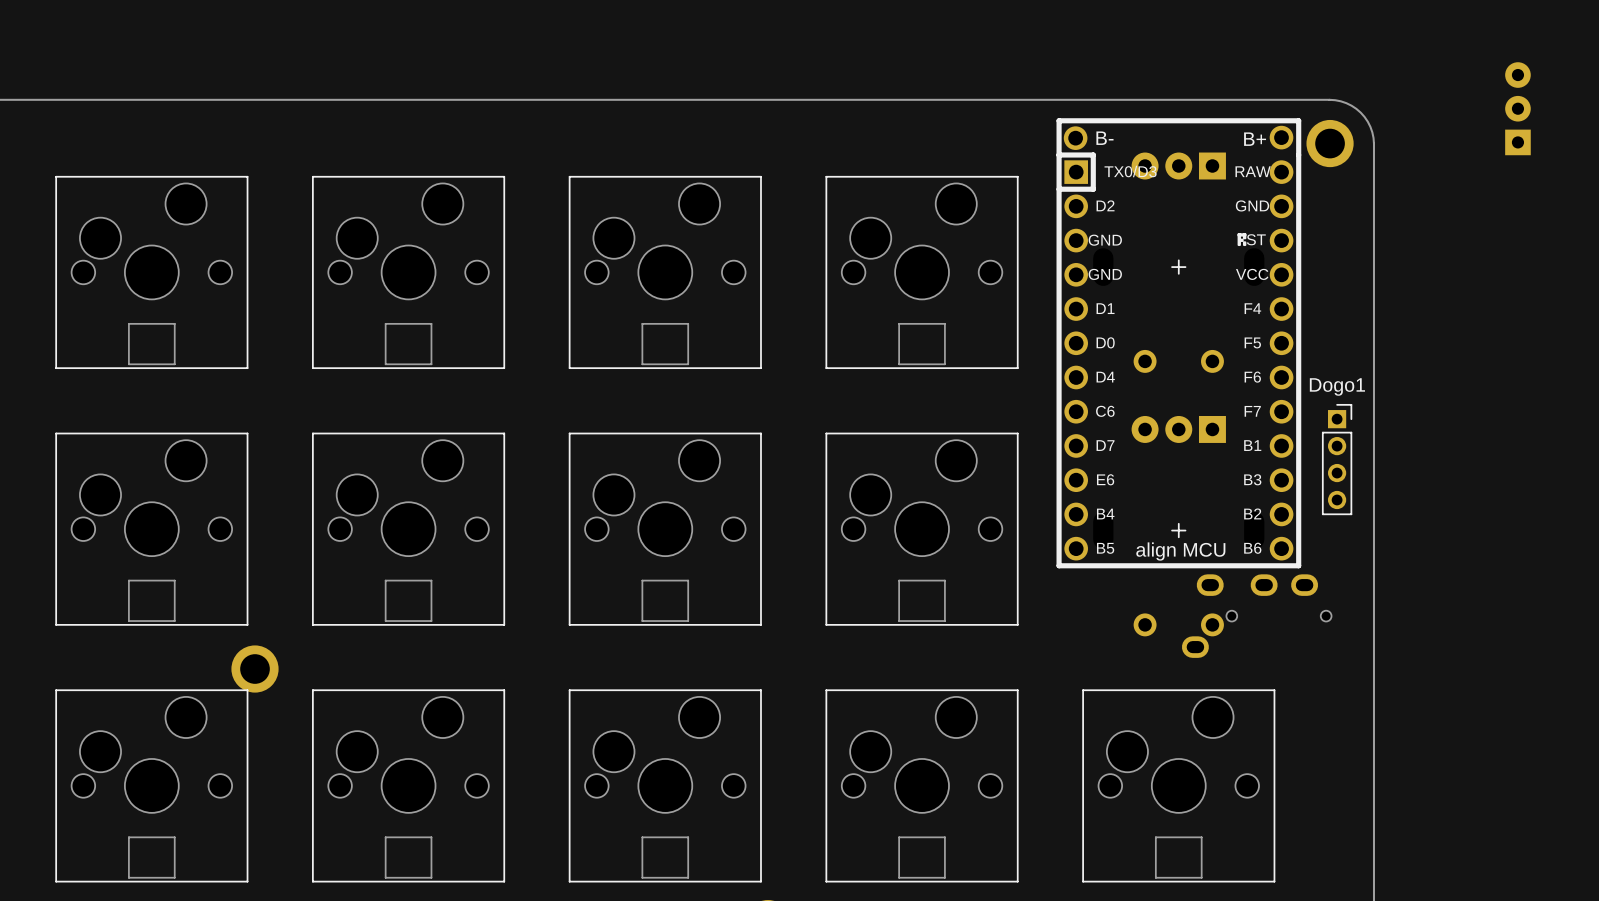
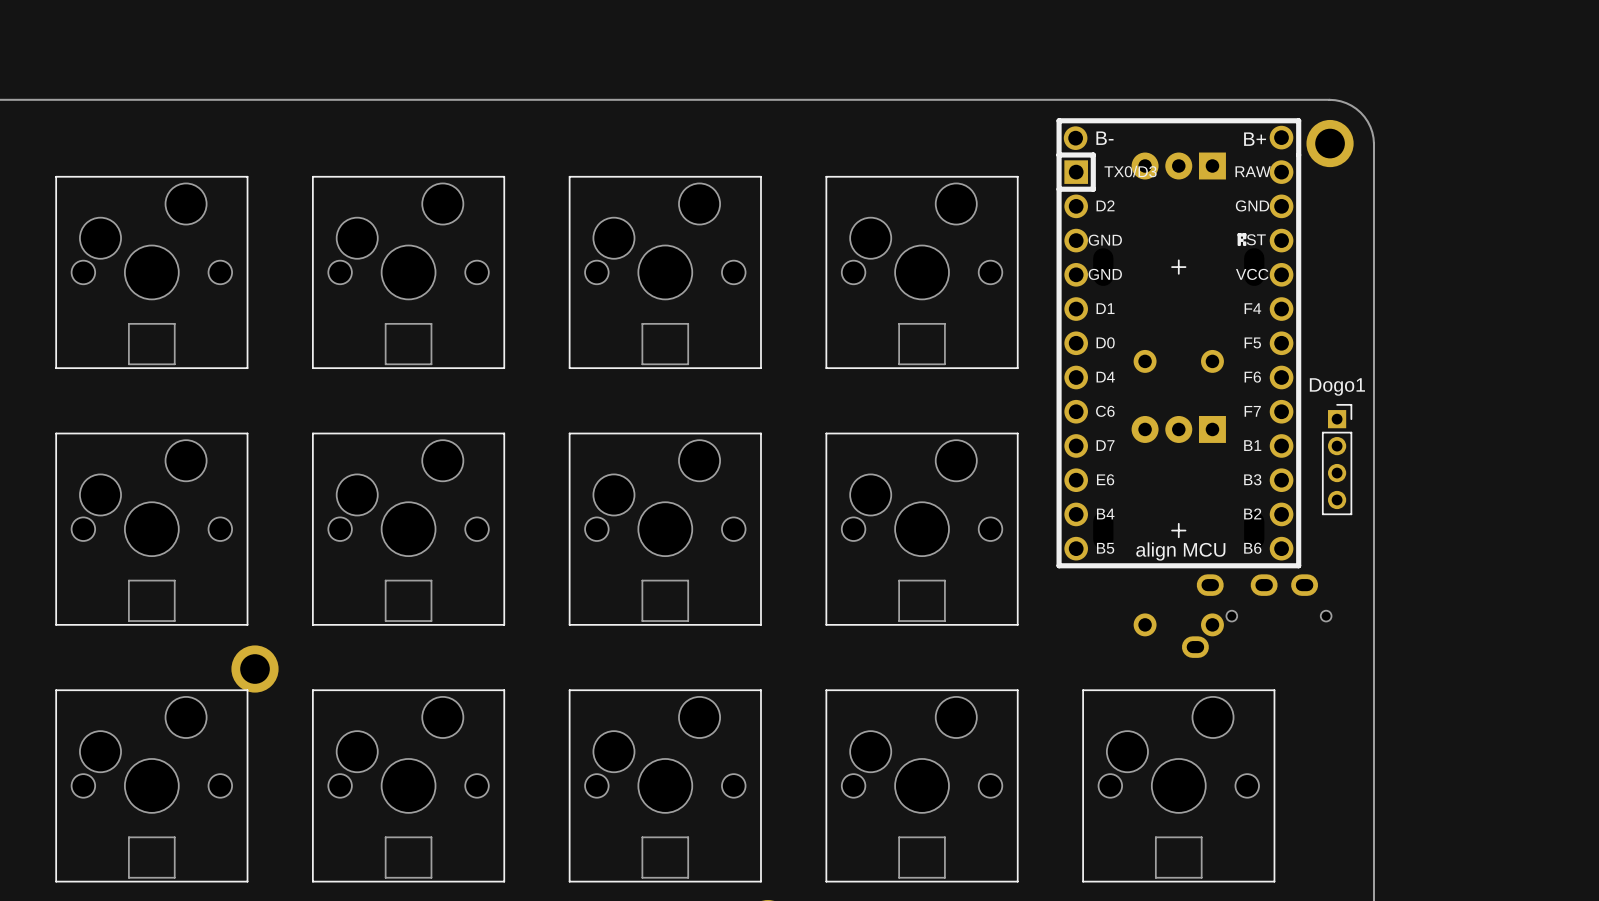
part: (1517, 108) -> none

